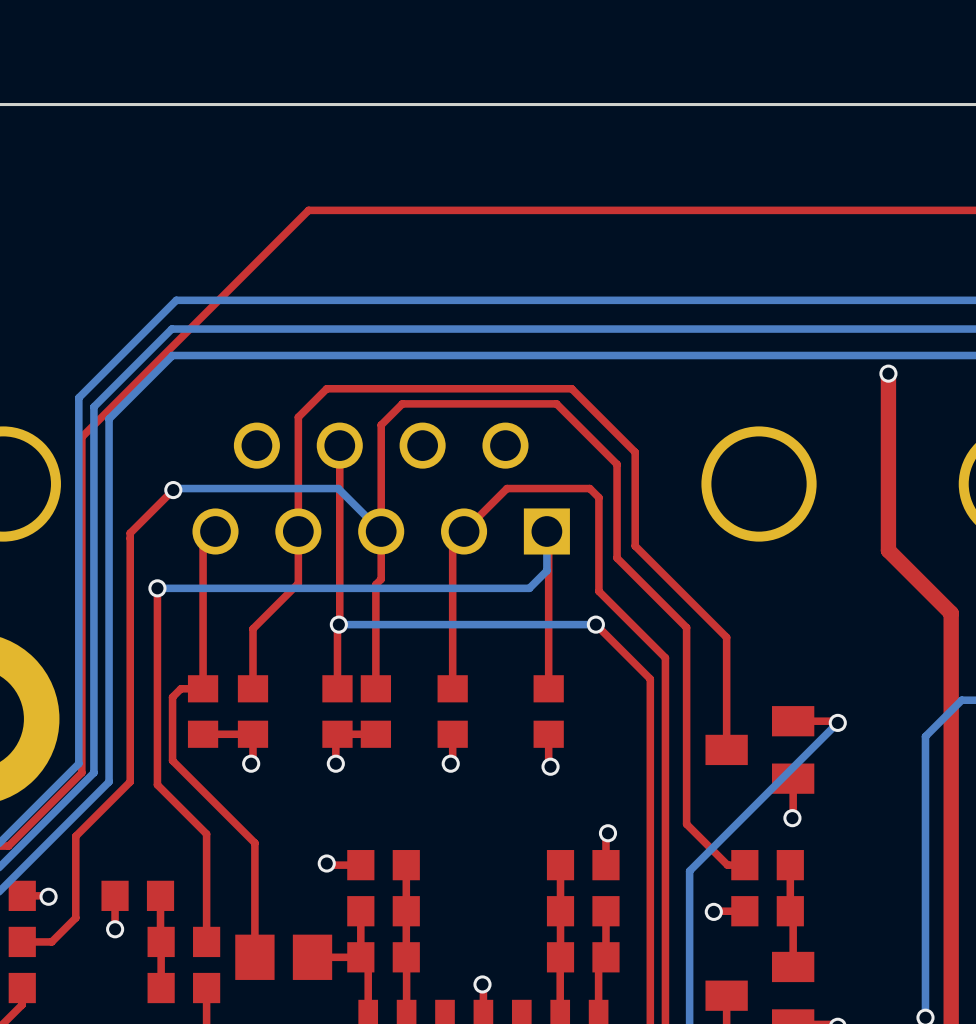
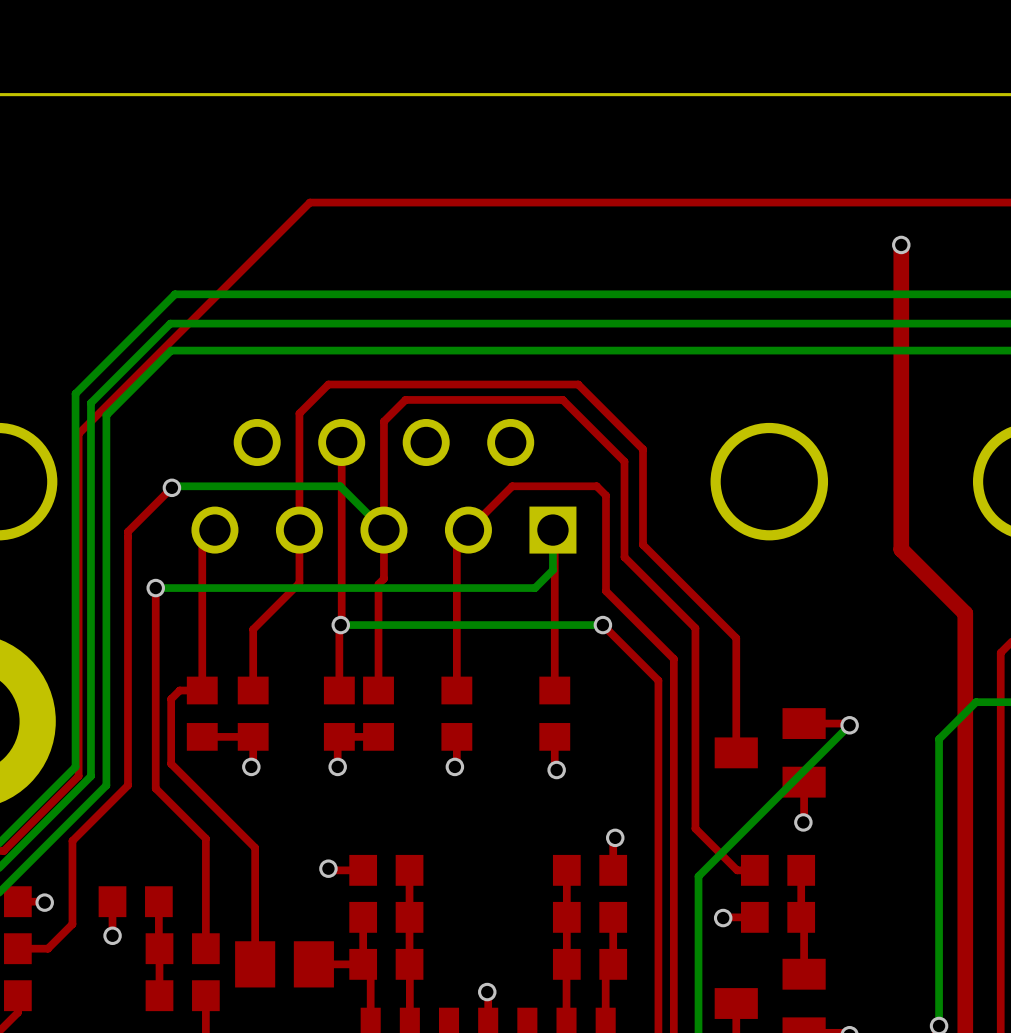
top track: none -> (901, 244) (901, 369)
via position: (888, 373) -> (901, 244)

